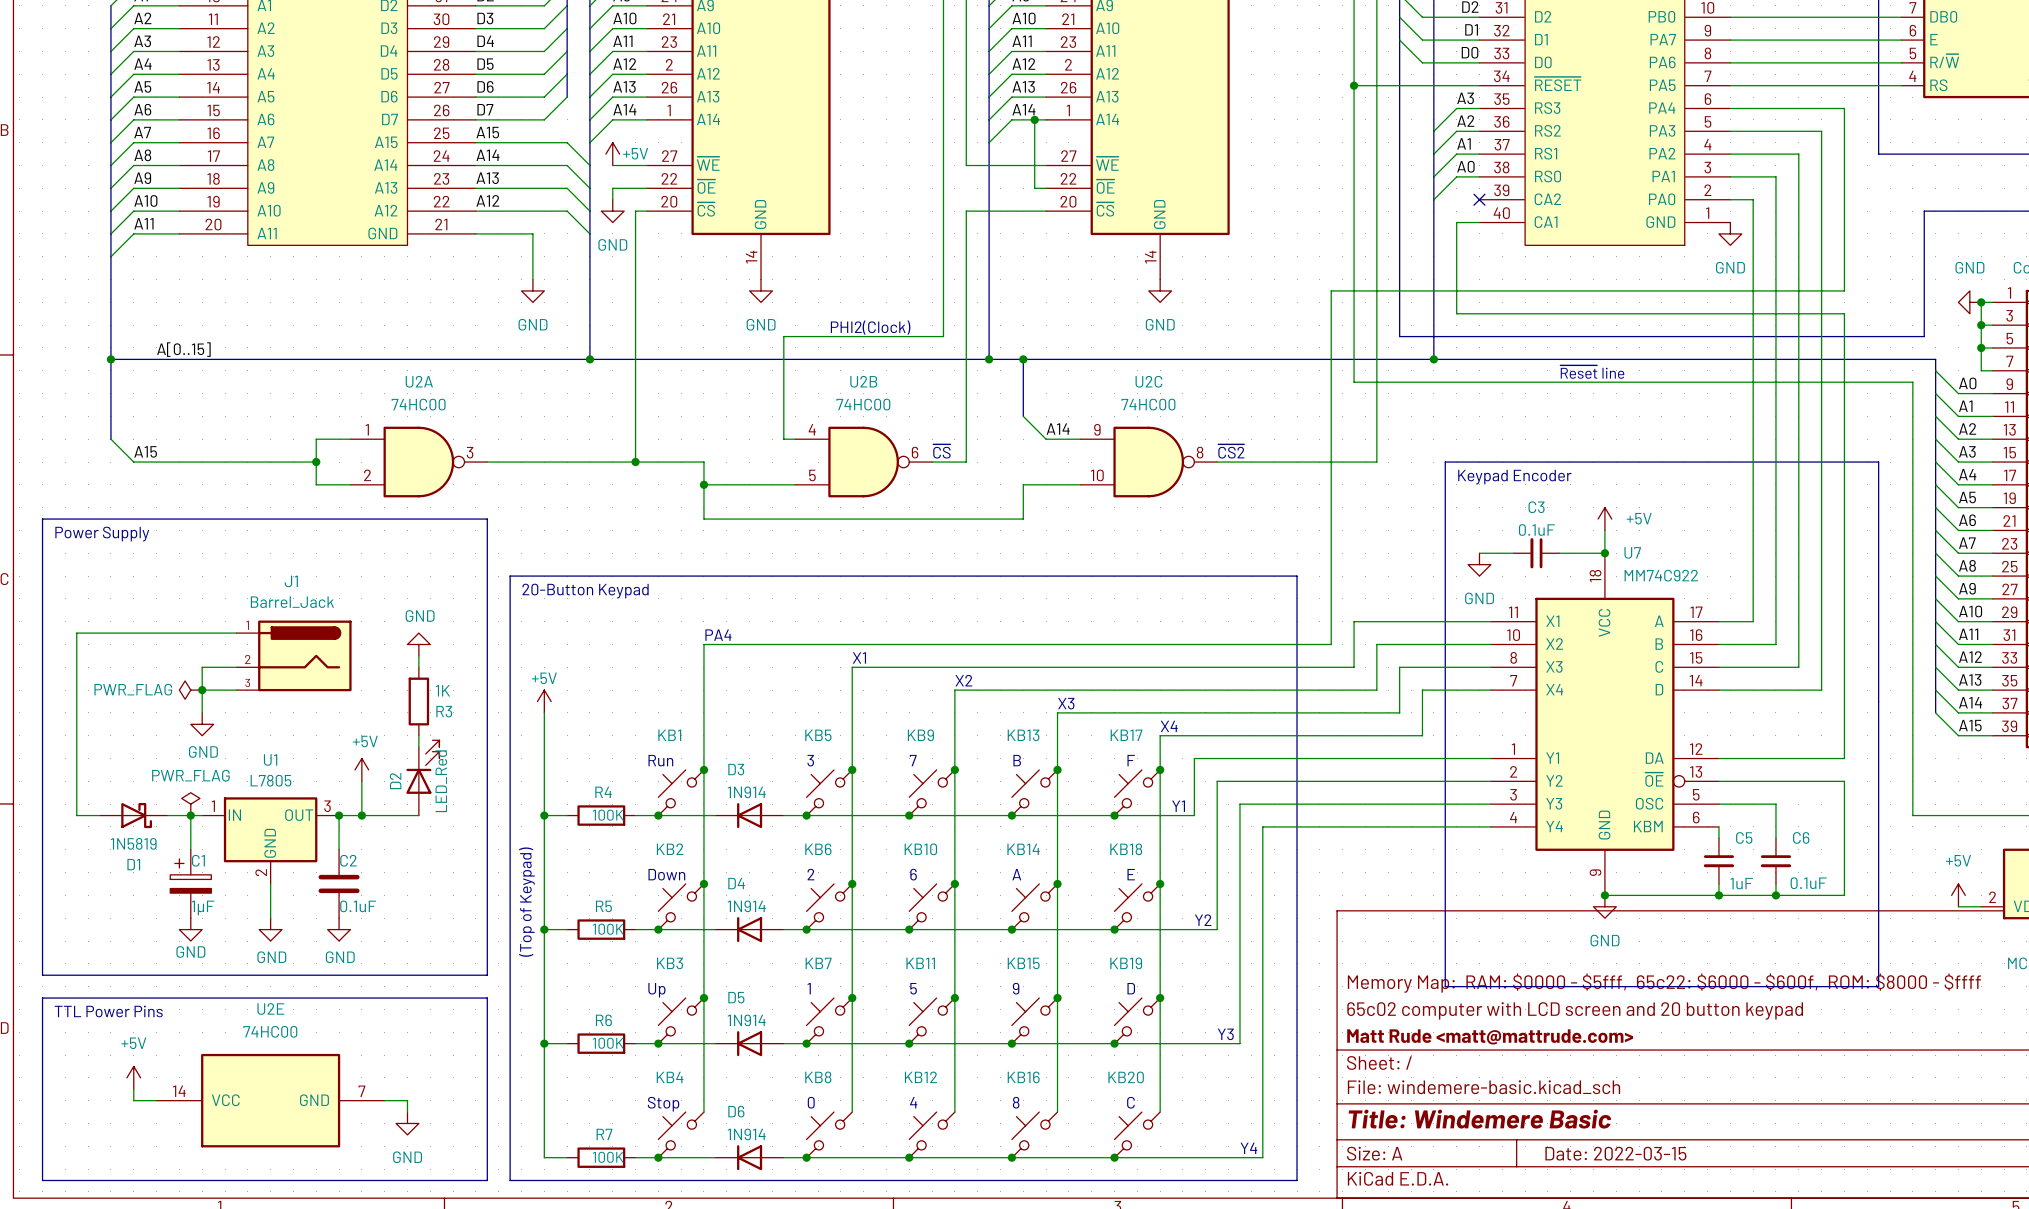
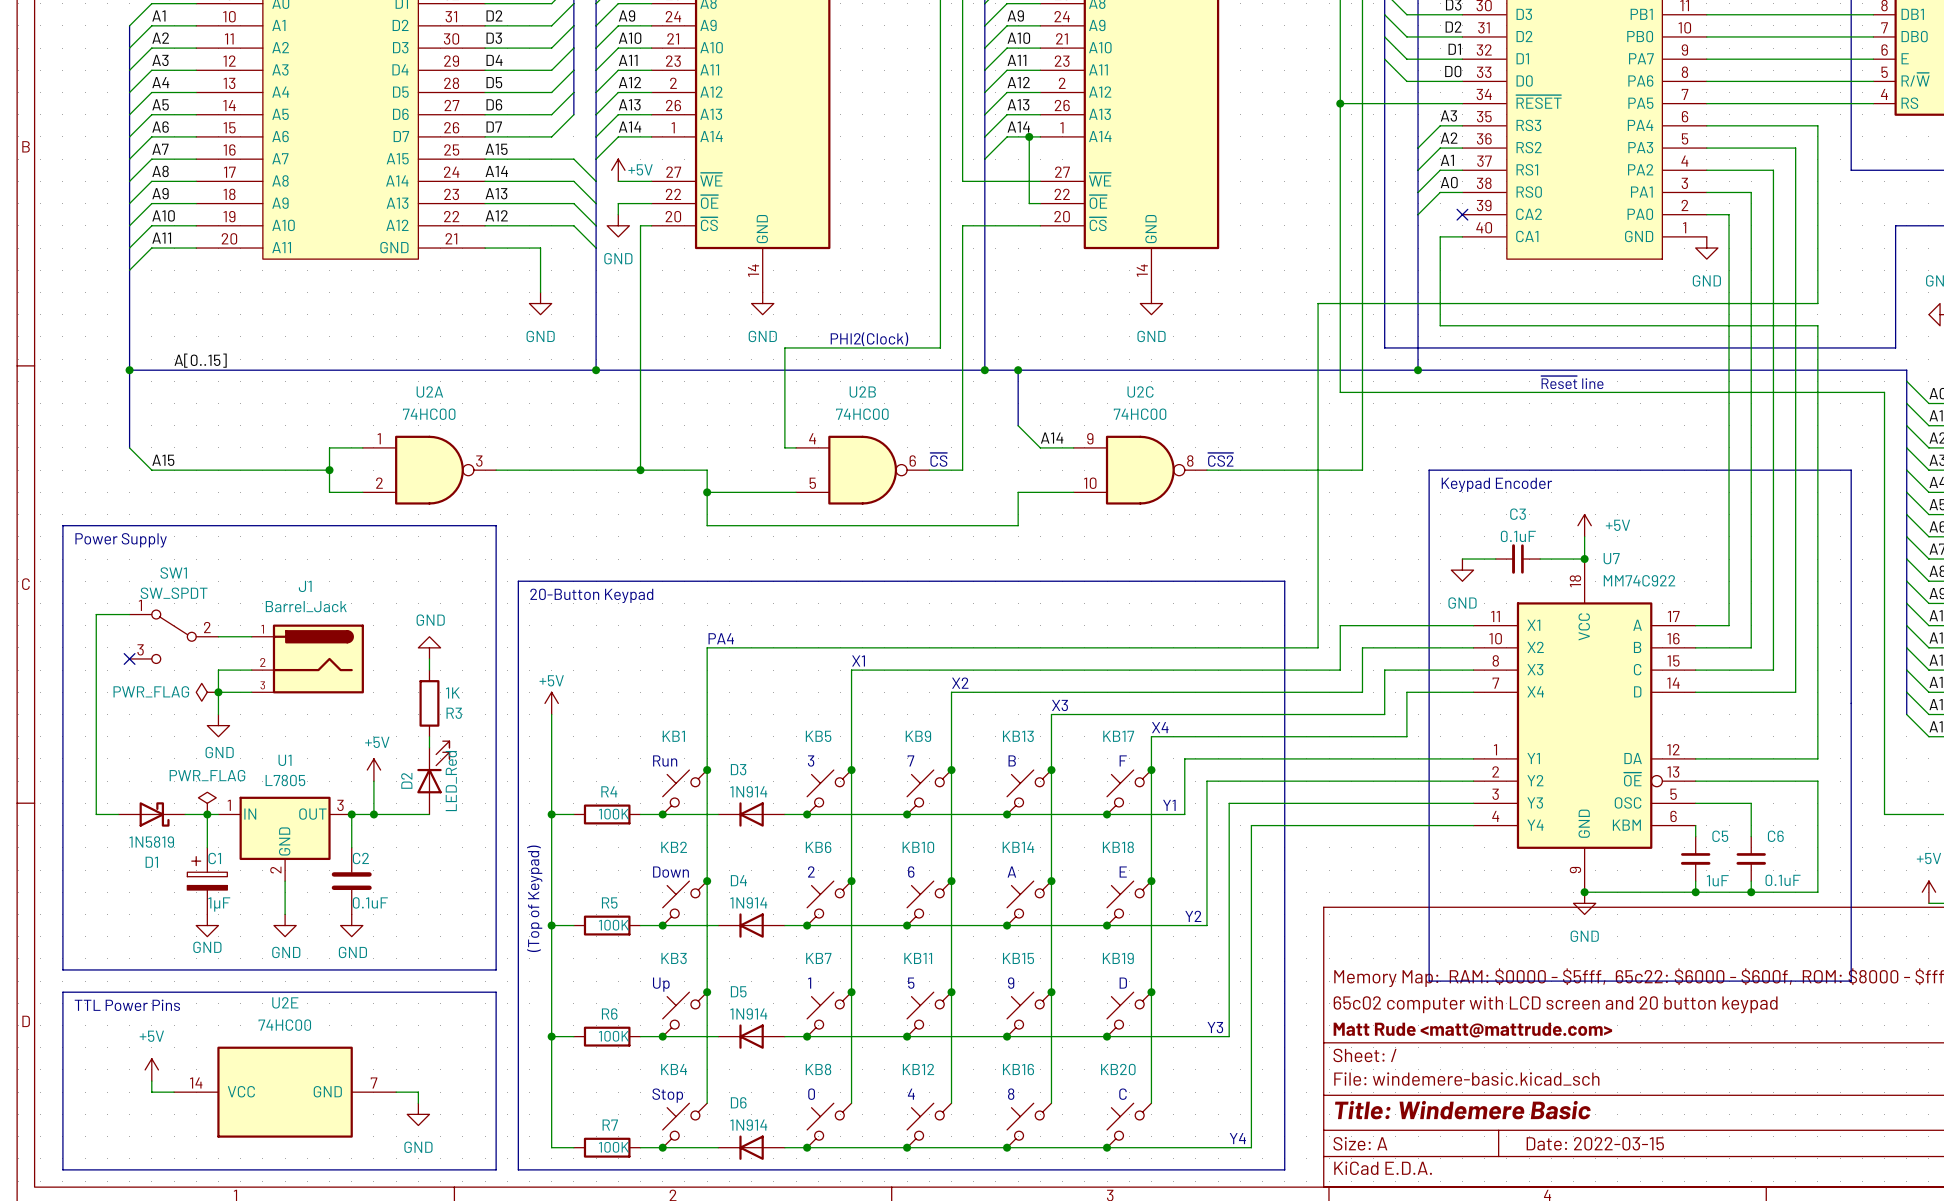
wire: (76, 633) (202, 633) -> (96, 636) (96, 614) (129, 614)
SW1: none -> SW_SPDT (174, 636)
no-connect mark: none -> (129, 658)

